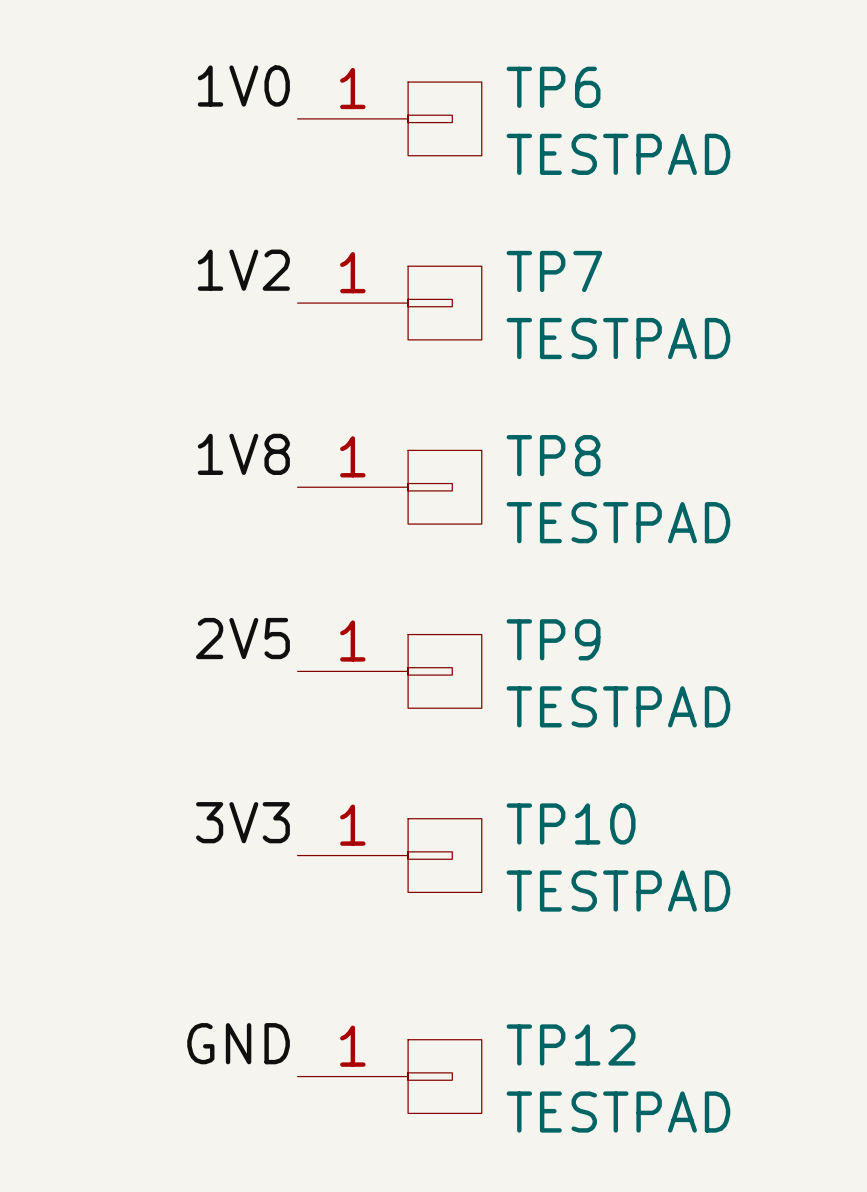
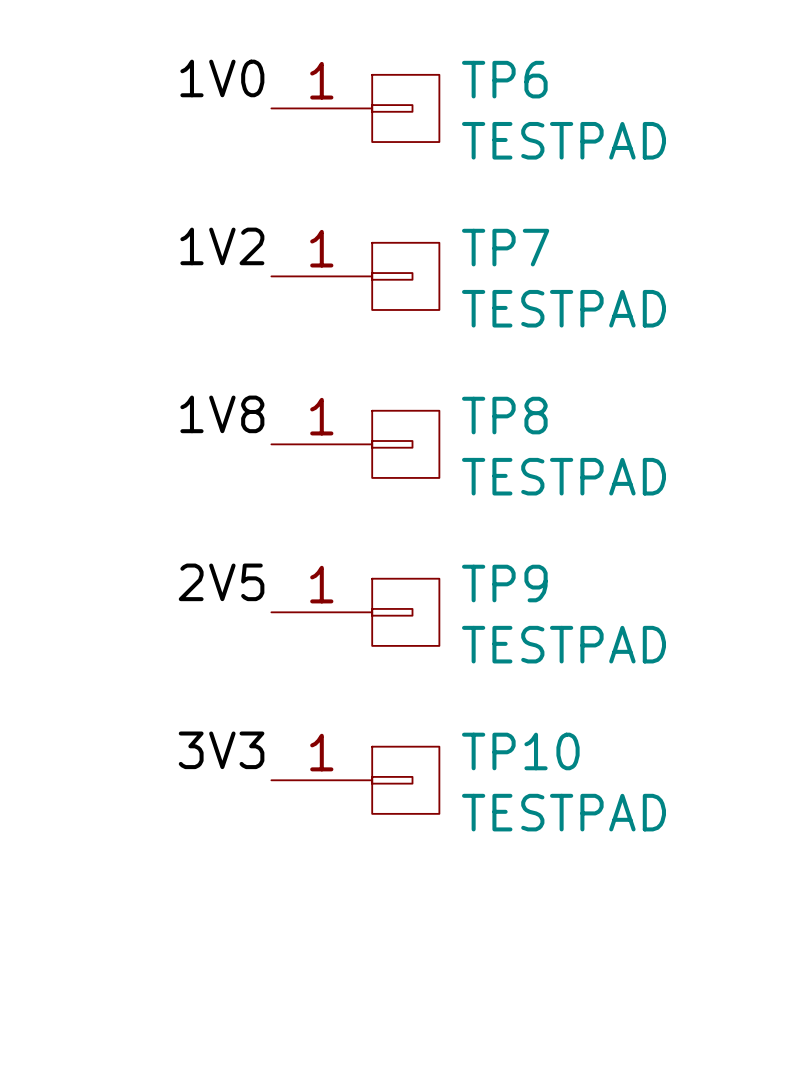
label: GND (238, 1043) -> none
TP12: TESTPAD (389, 1076) -> none

